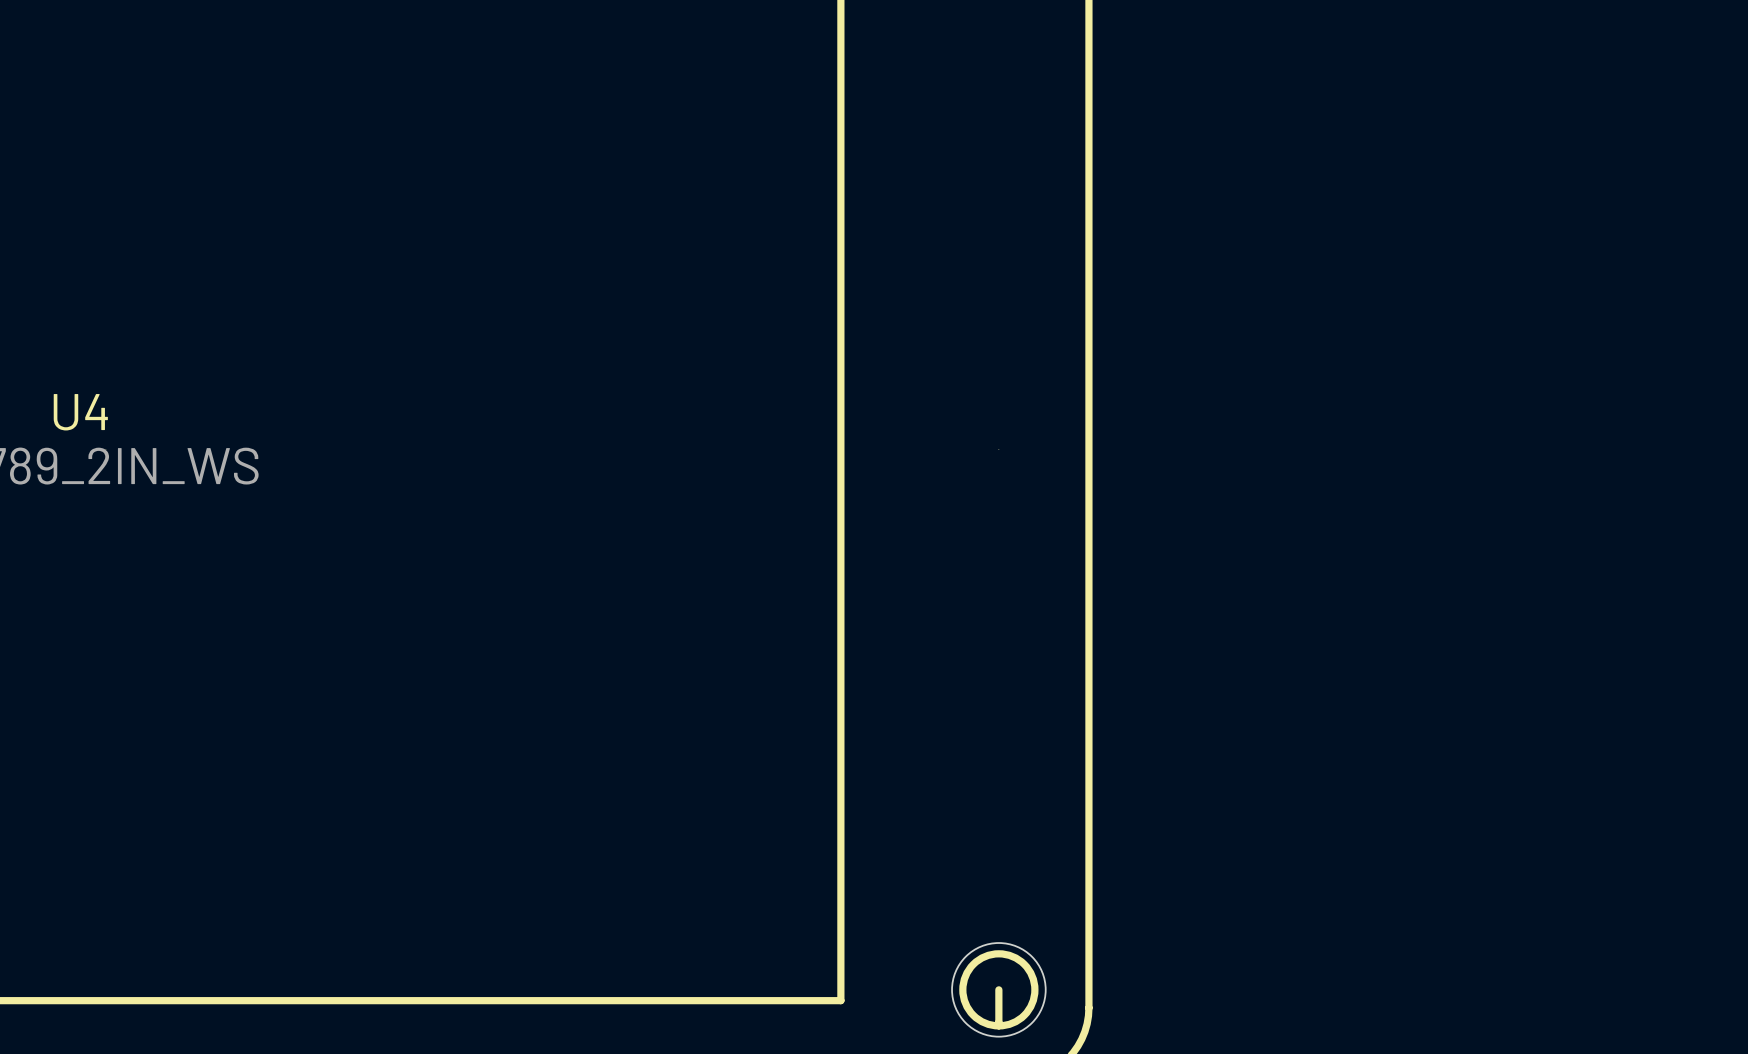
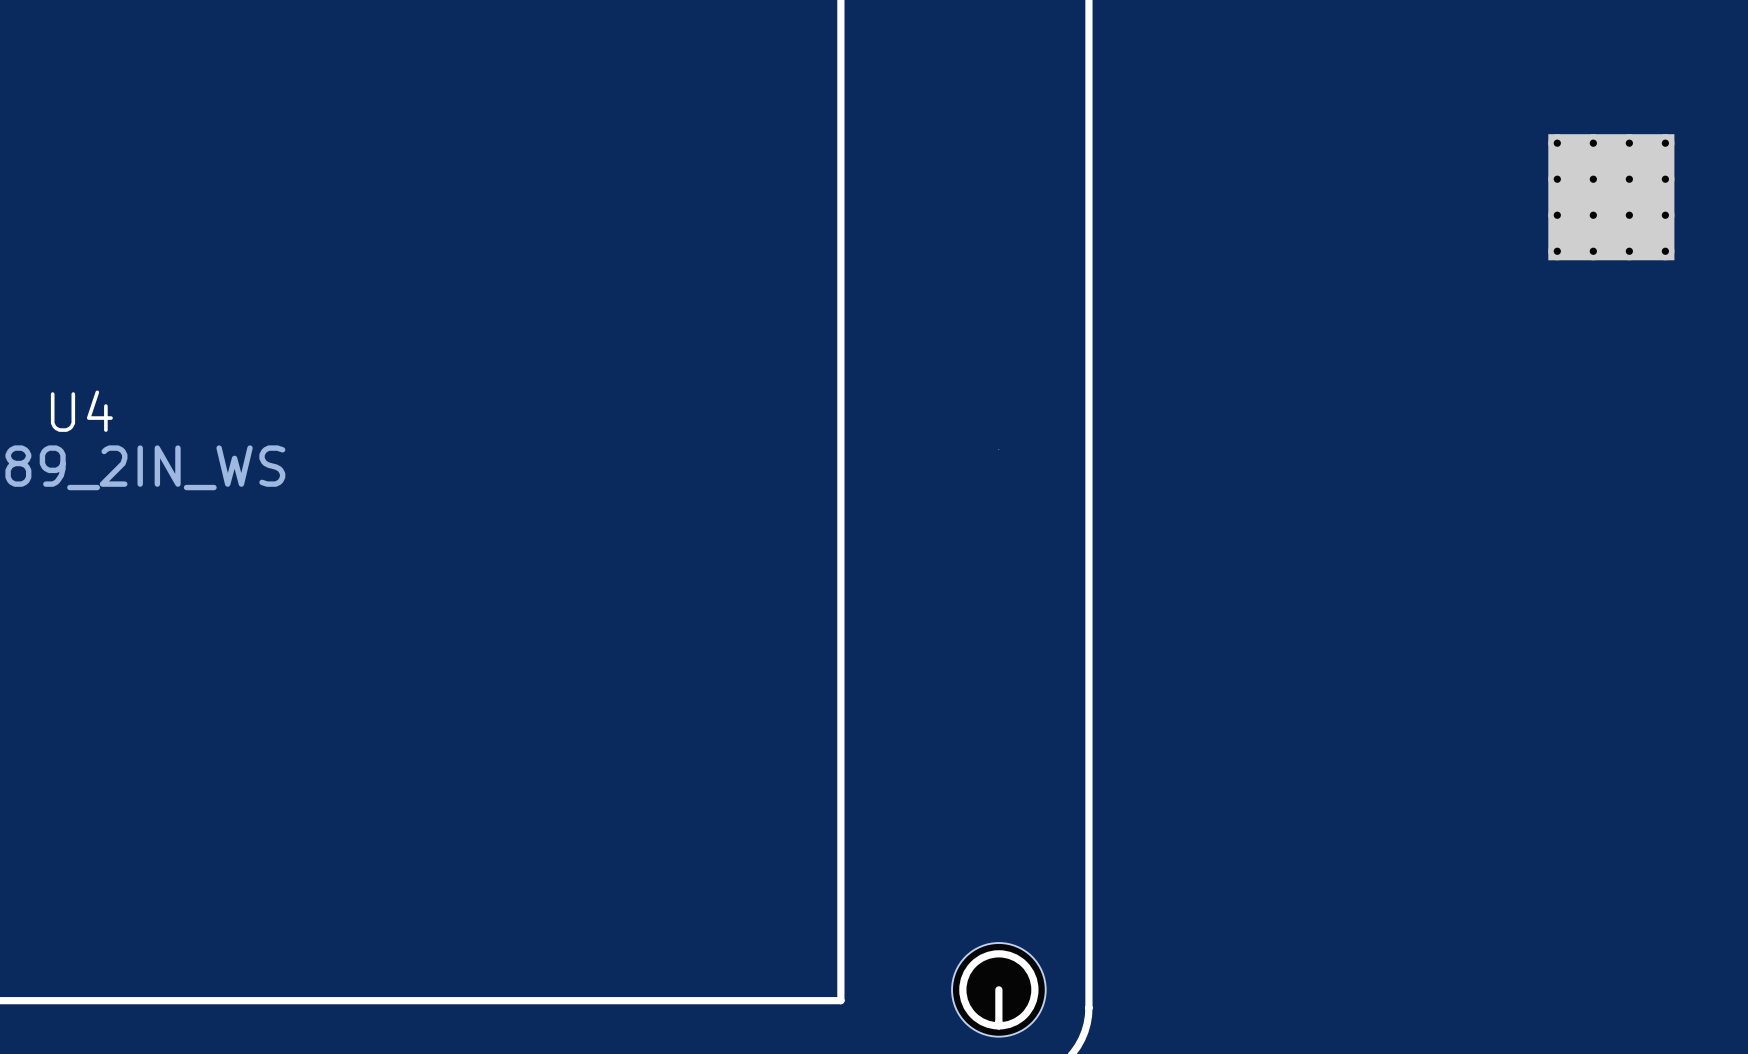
part: none -> (1611, 197)

